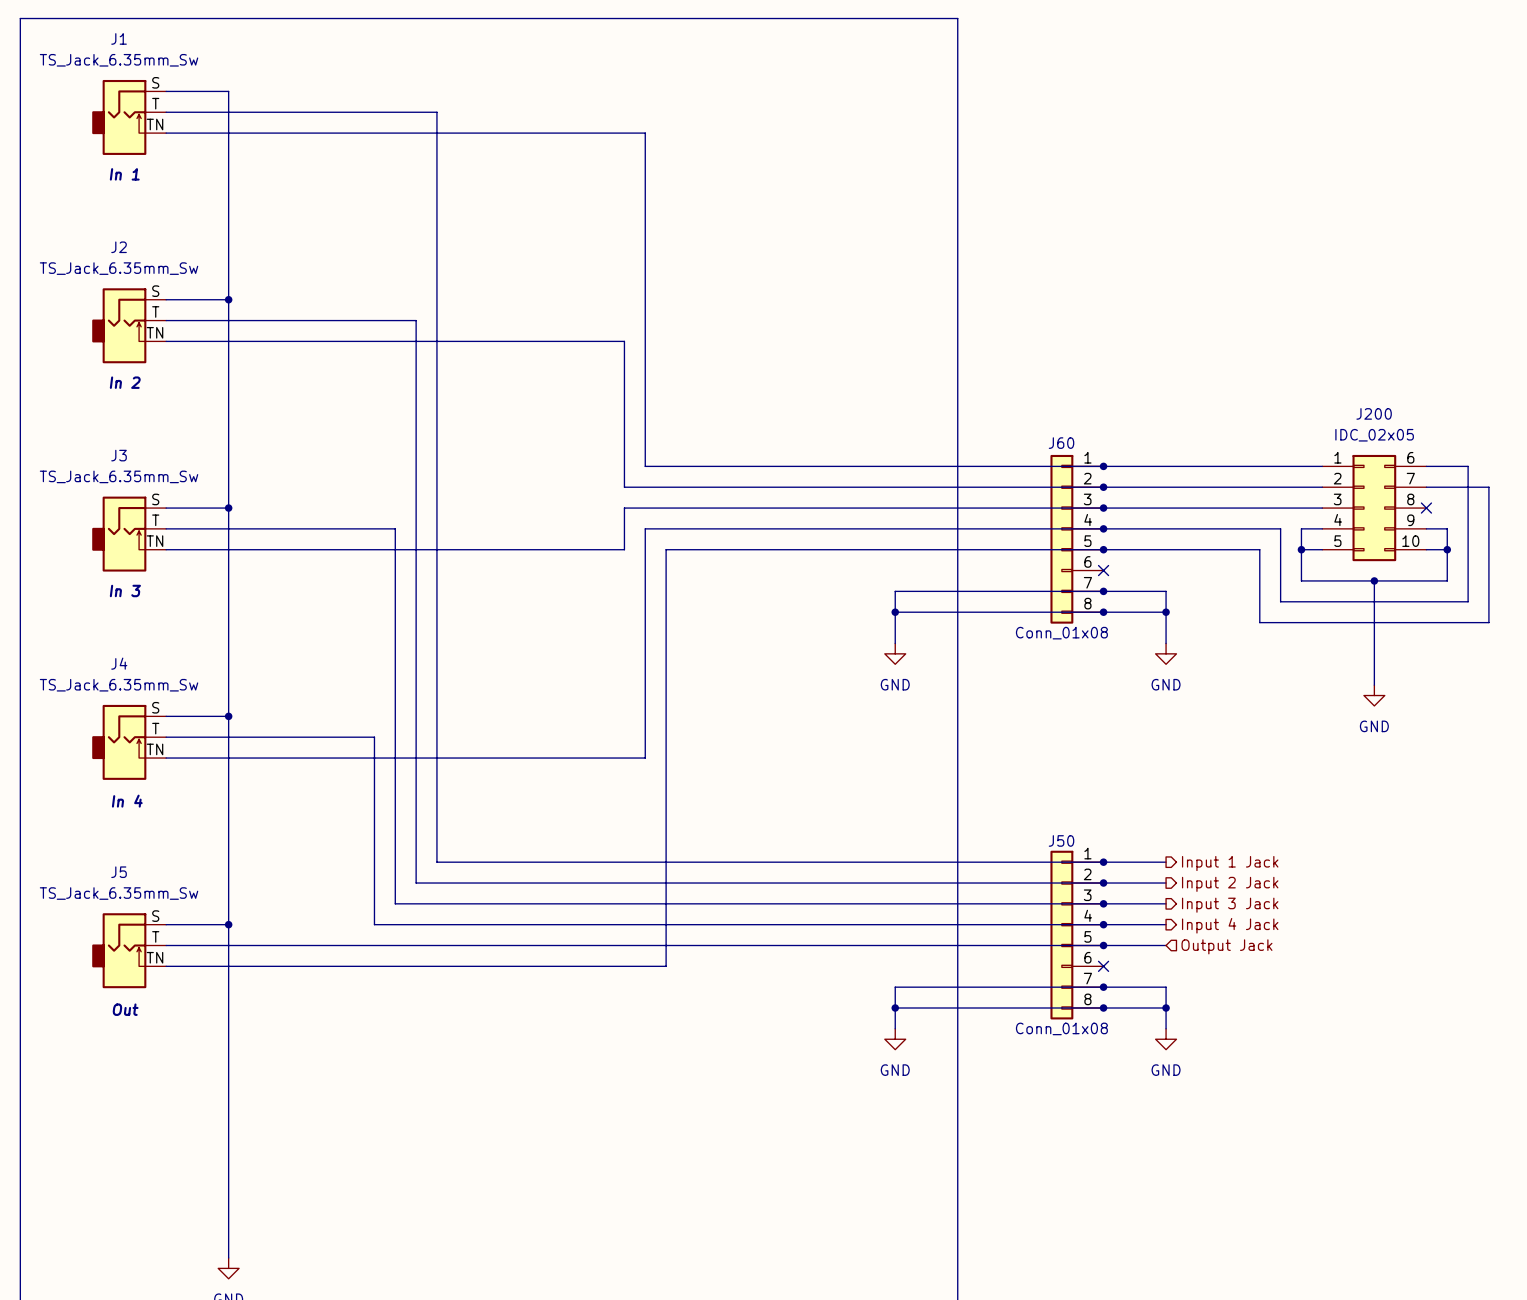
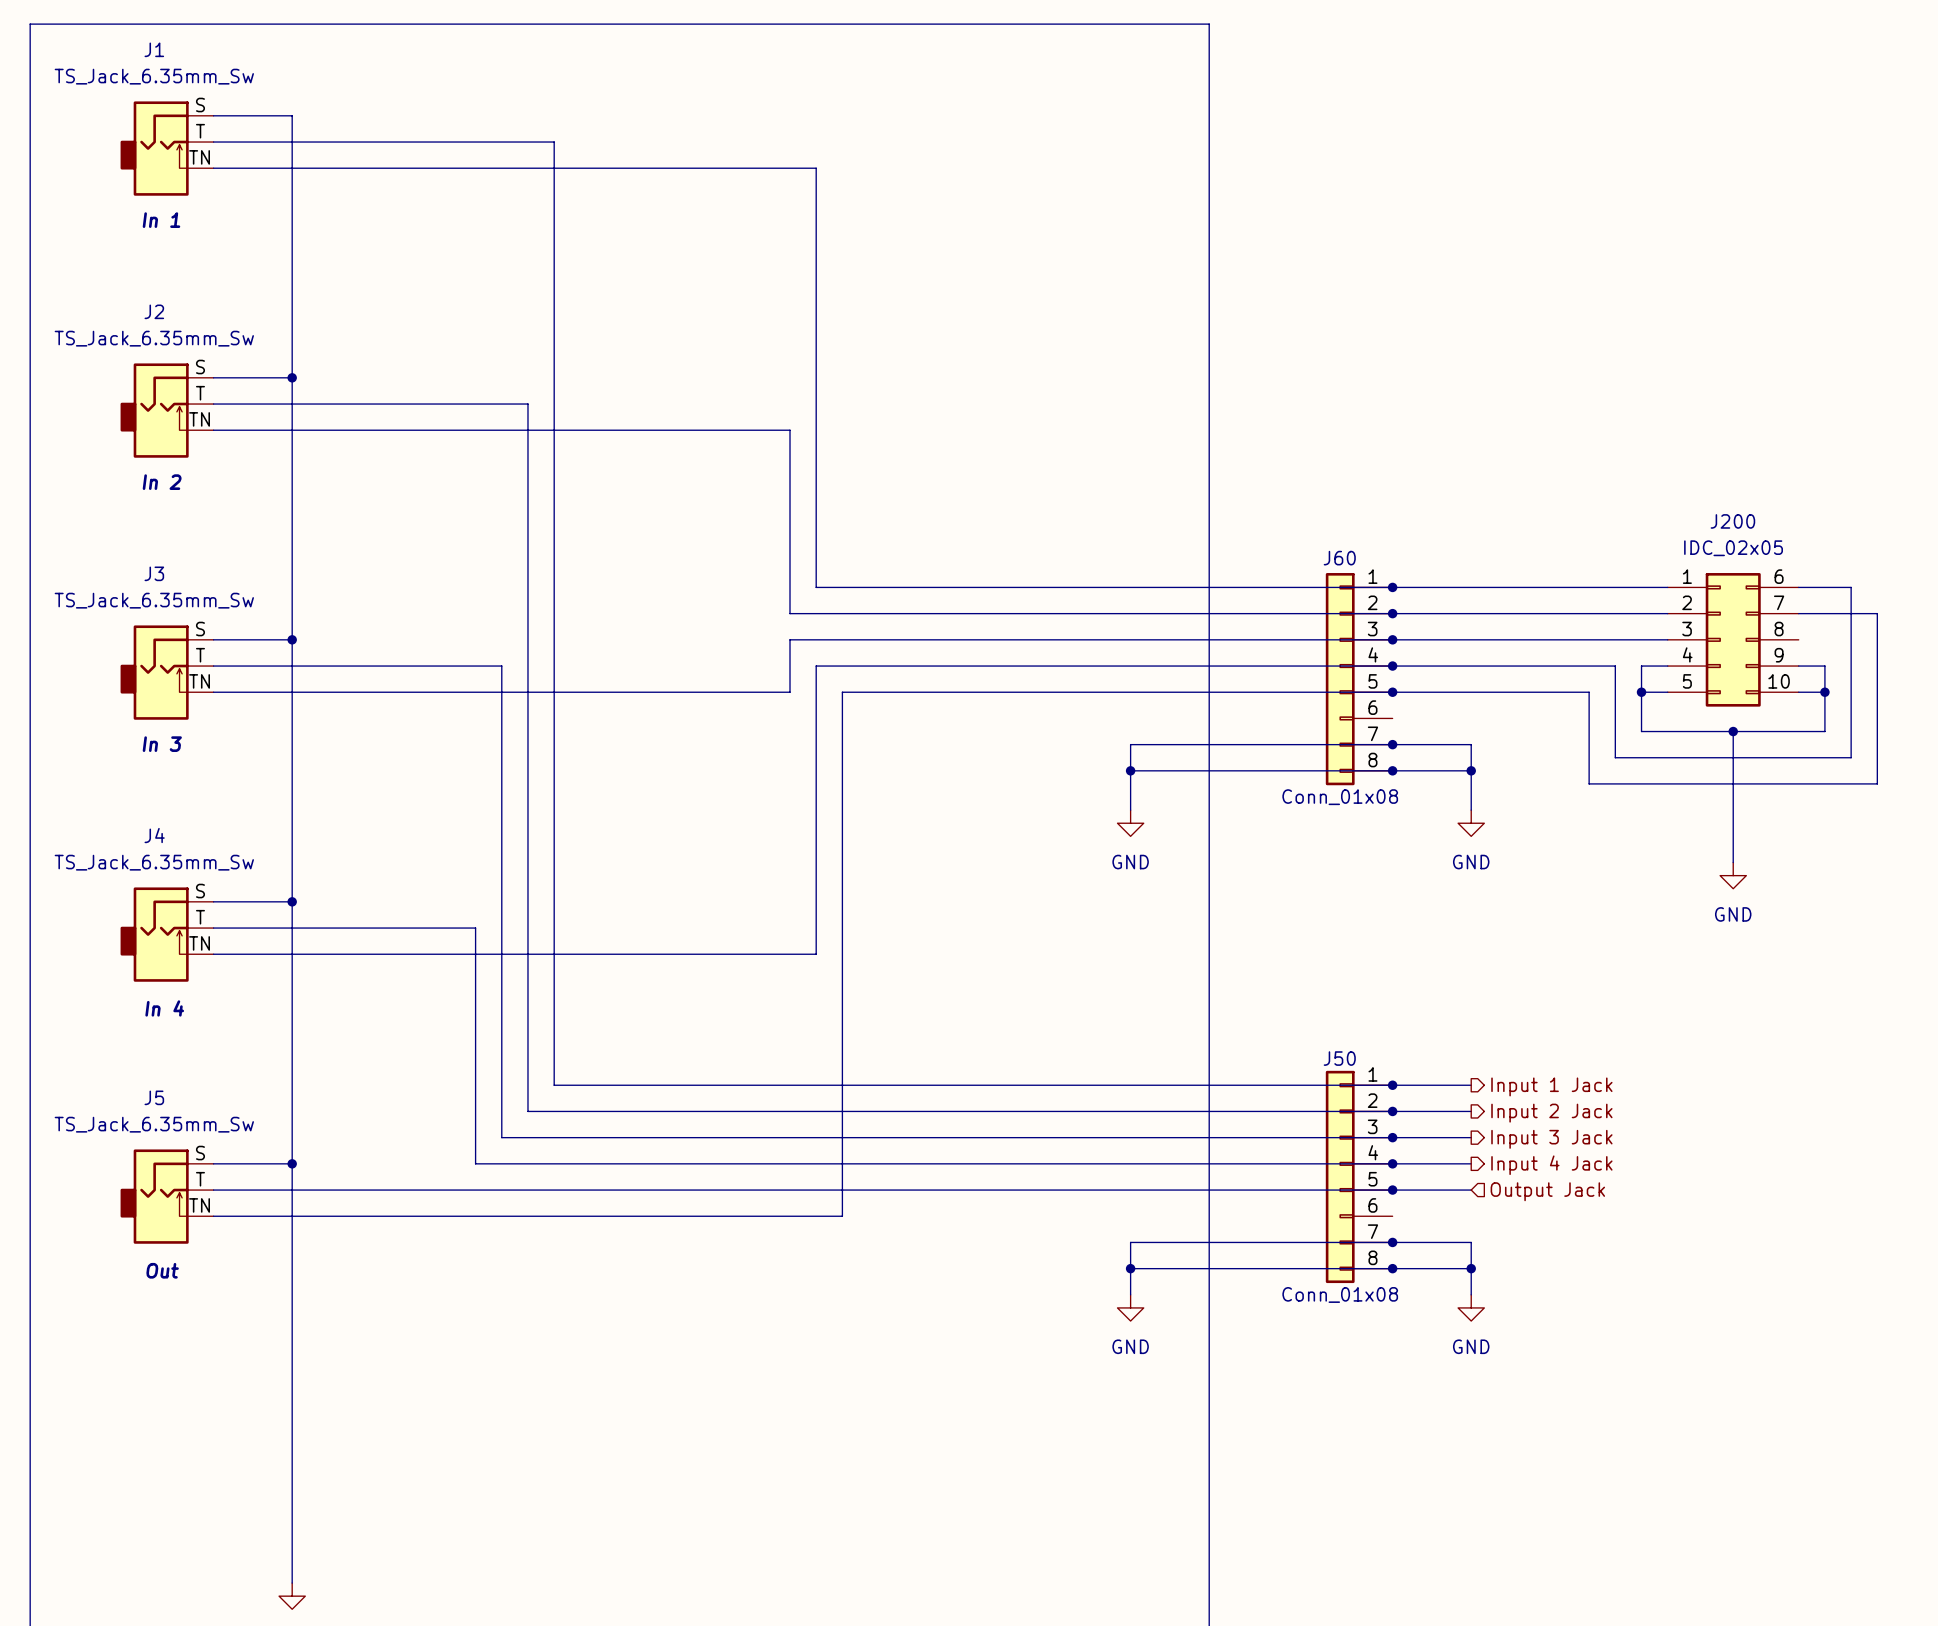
no-connect mark: (1426, 508) -> none
no-connect mark: (1103, 570) -> none
no-connect mark: (1103, 966) -> none

